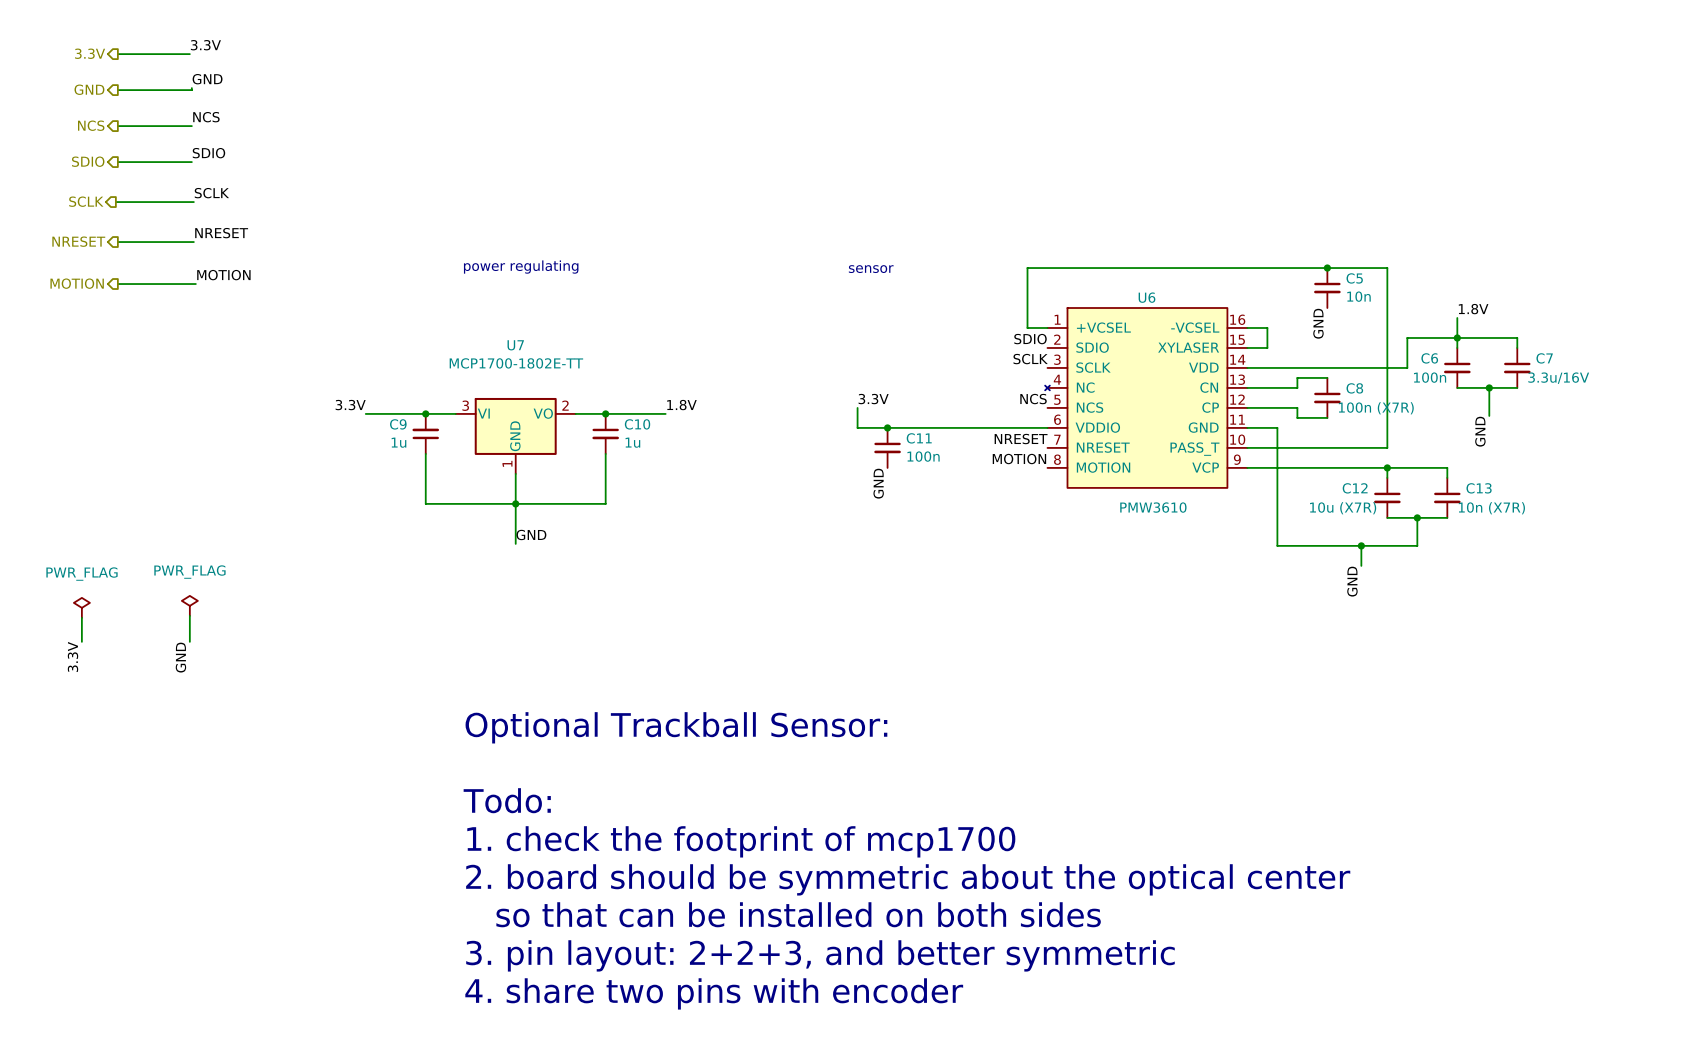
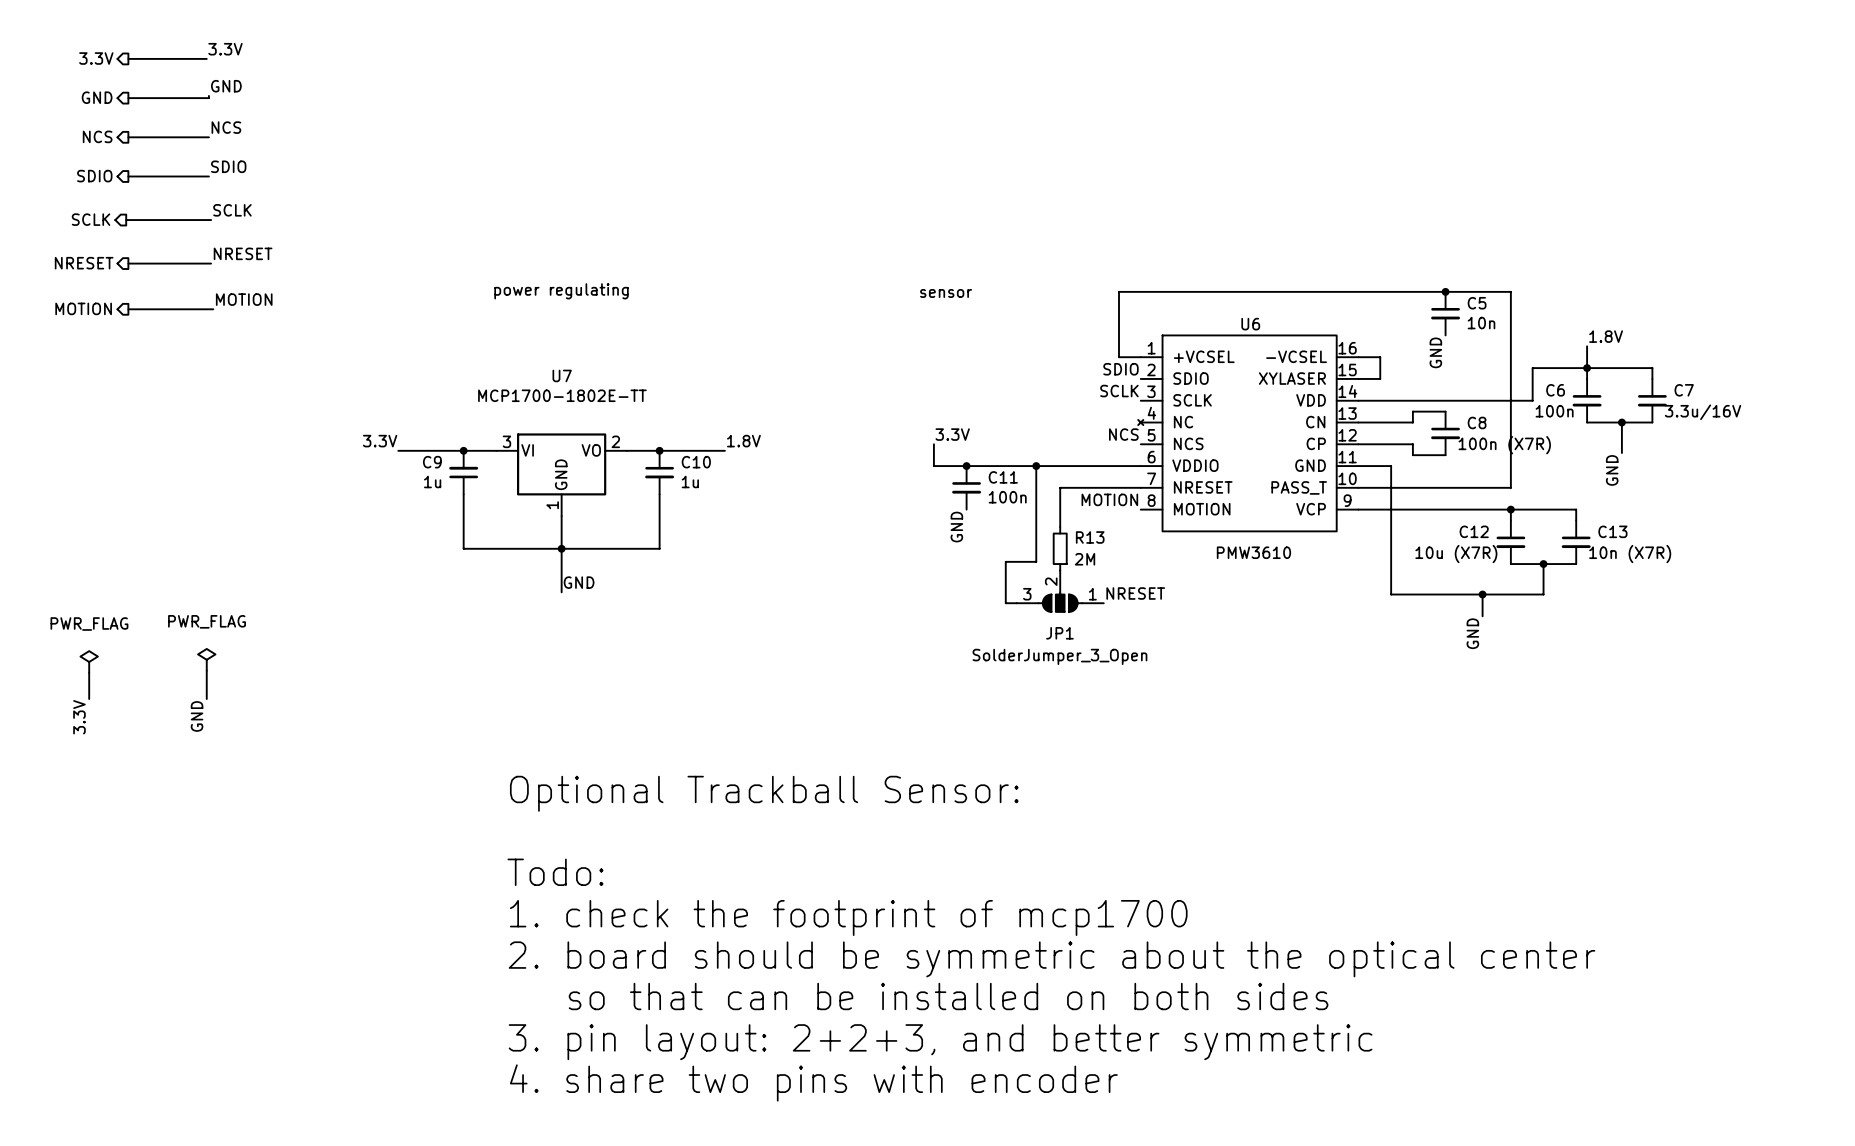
wire: none -> (1036, 466) (1036, 561) (1005, 561) (1005, 603) (1016, 603)
junction: none -> (1036, 466)
label position: NRESET (1021, 439) -> NRESET (1135, 593)
wire: none -> (1140, 487) (1060, 487) (1060, 527)
R13: none -> 2M (1060, 548)
JP1: none -> SolderJumper_3_Open (1060, 591)

